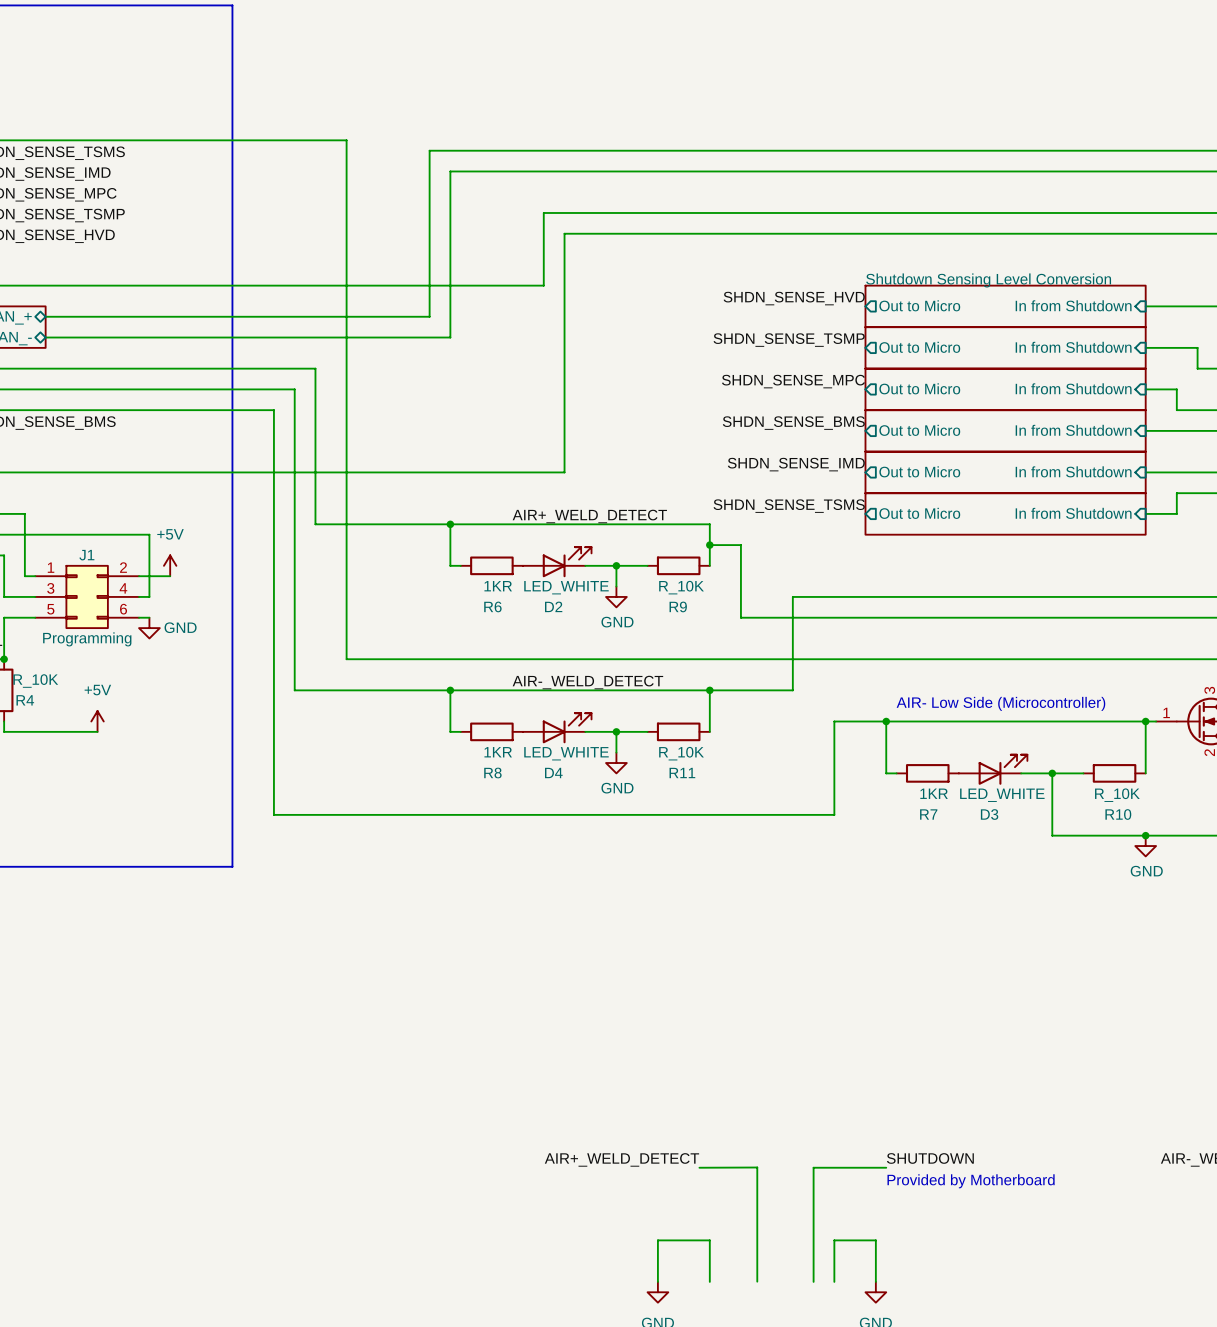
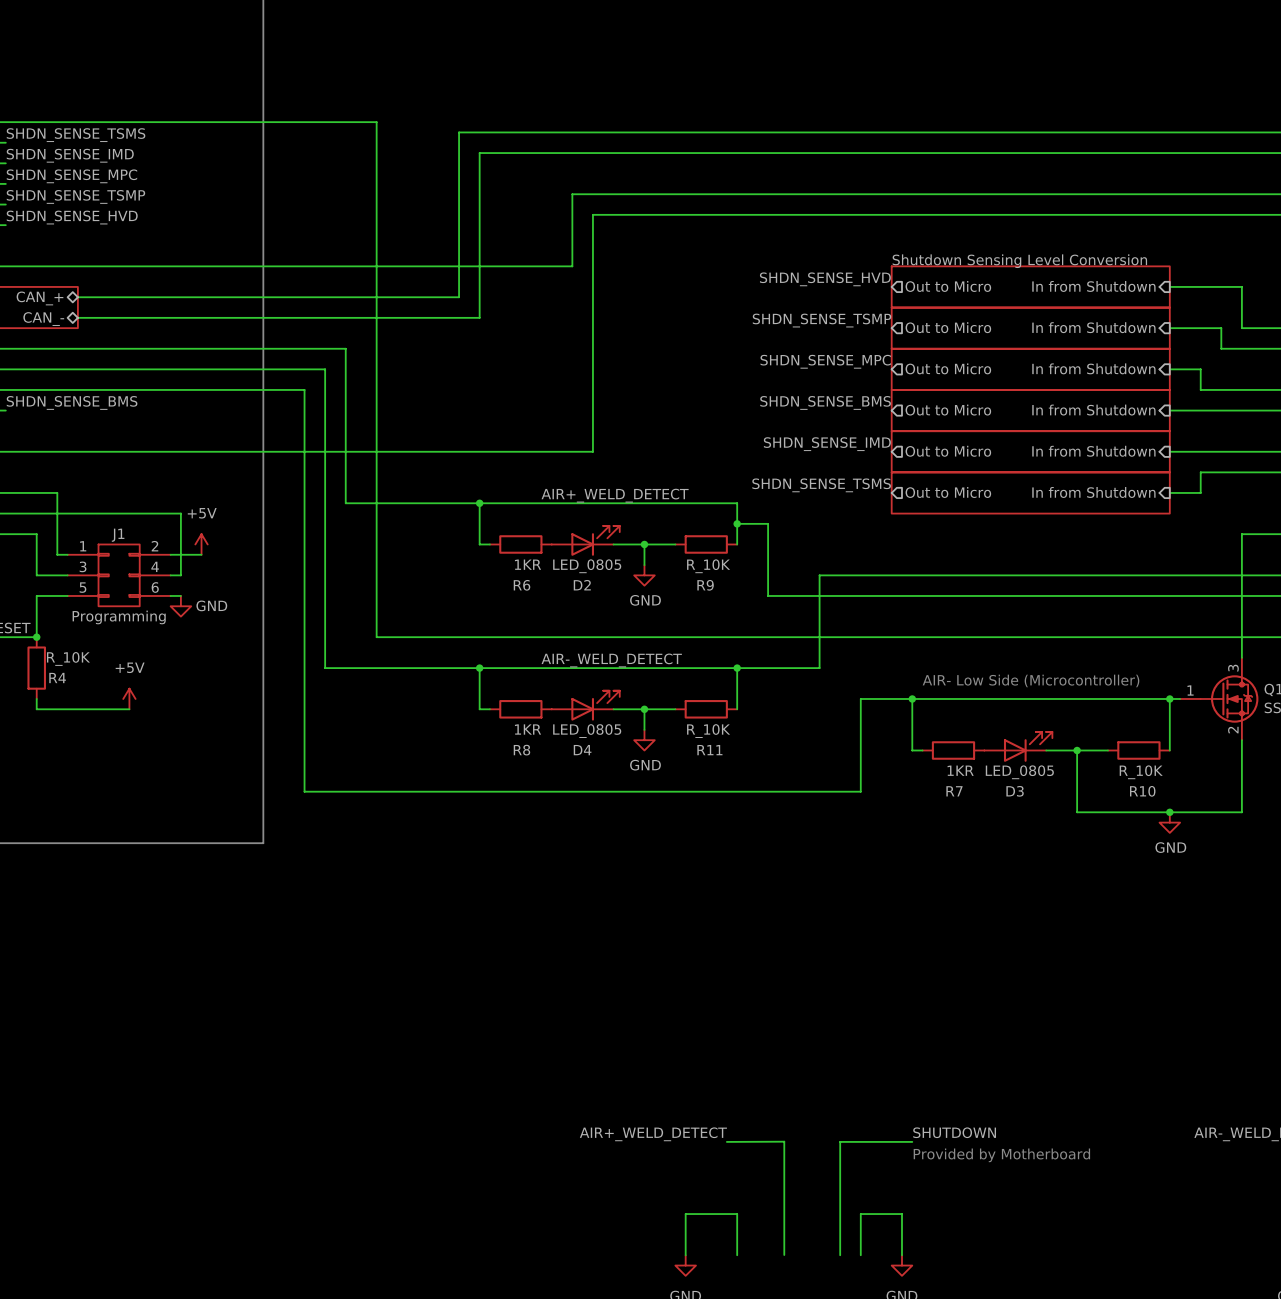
D2 value: LED_WHITE (566, 587) -> LED_0805 (587, 566)
D4 value: LED_WHITE (566, 753) -> LED_0805 (587, 731)
D3 value: LED_WHITE (1002, 795) -> LED_0805 (1019, 772)

